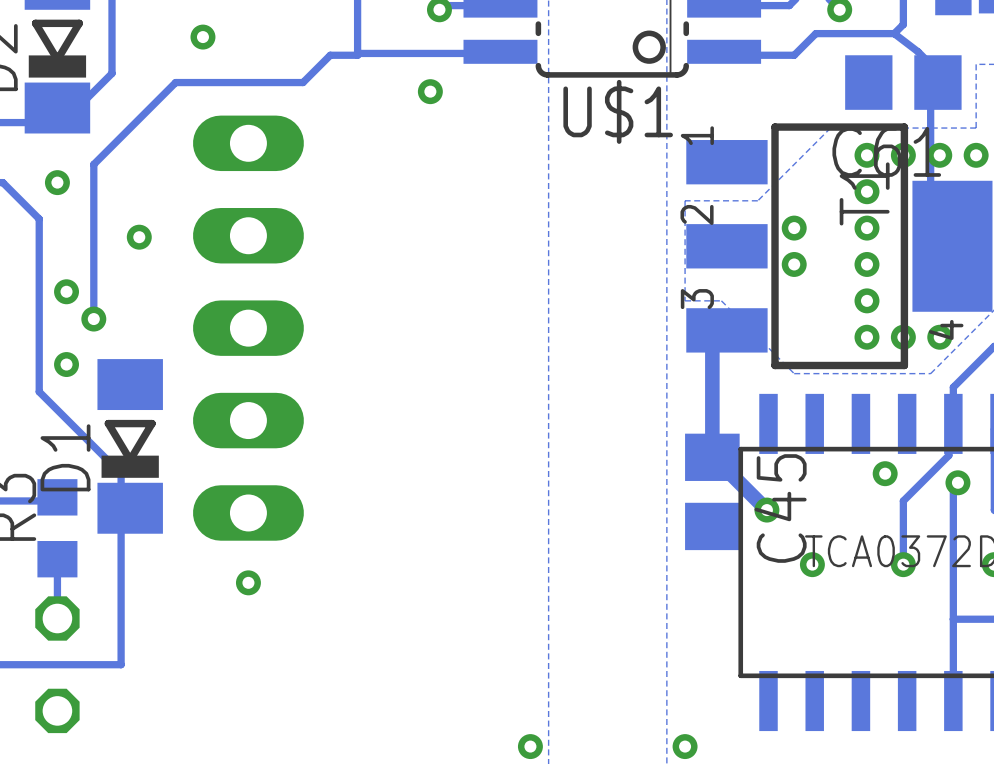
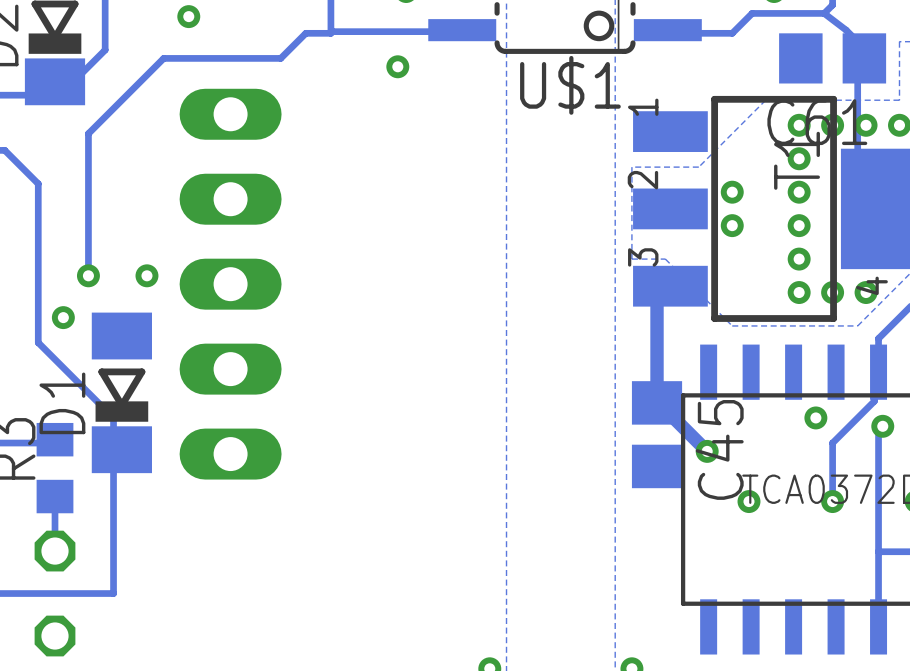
via: (57, 182) -> none
via: (139, 237) -> none
via: (66, 291) -> none
via: none -> (146, 275)
via: (248, 582) -> none

